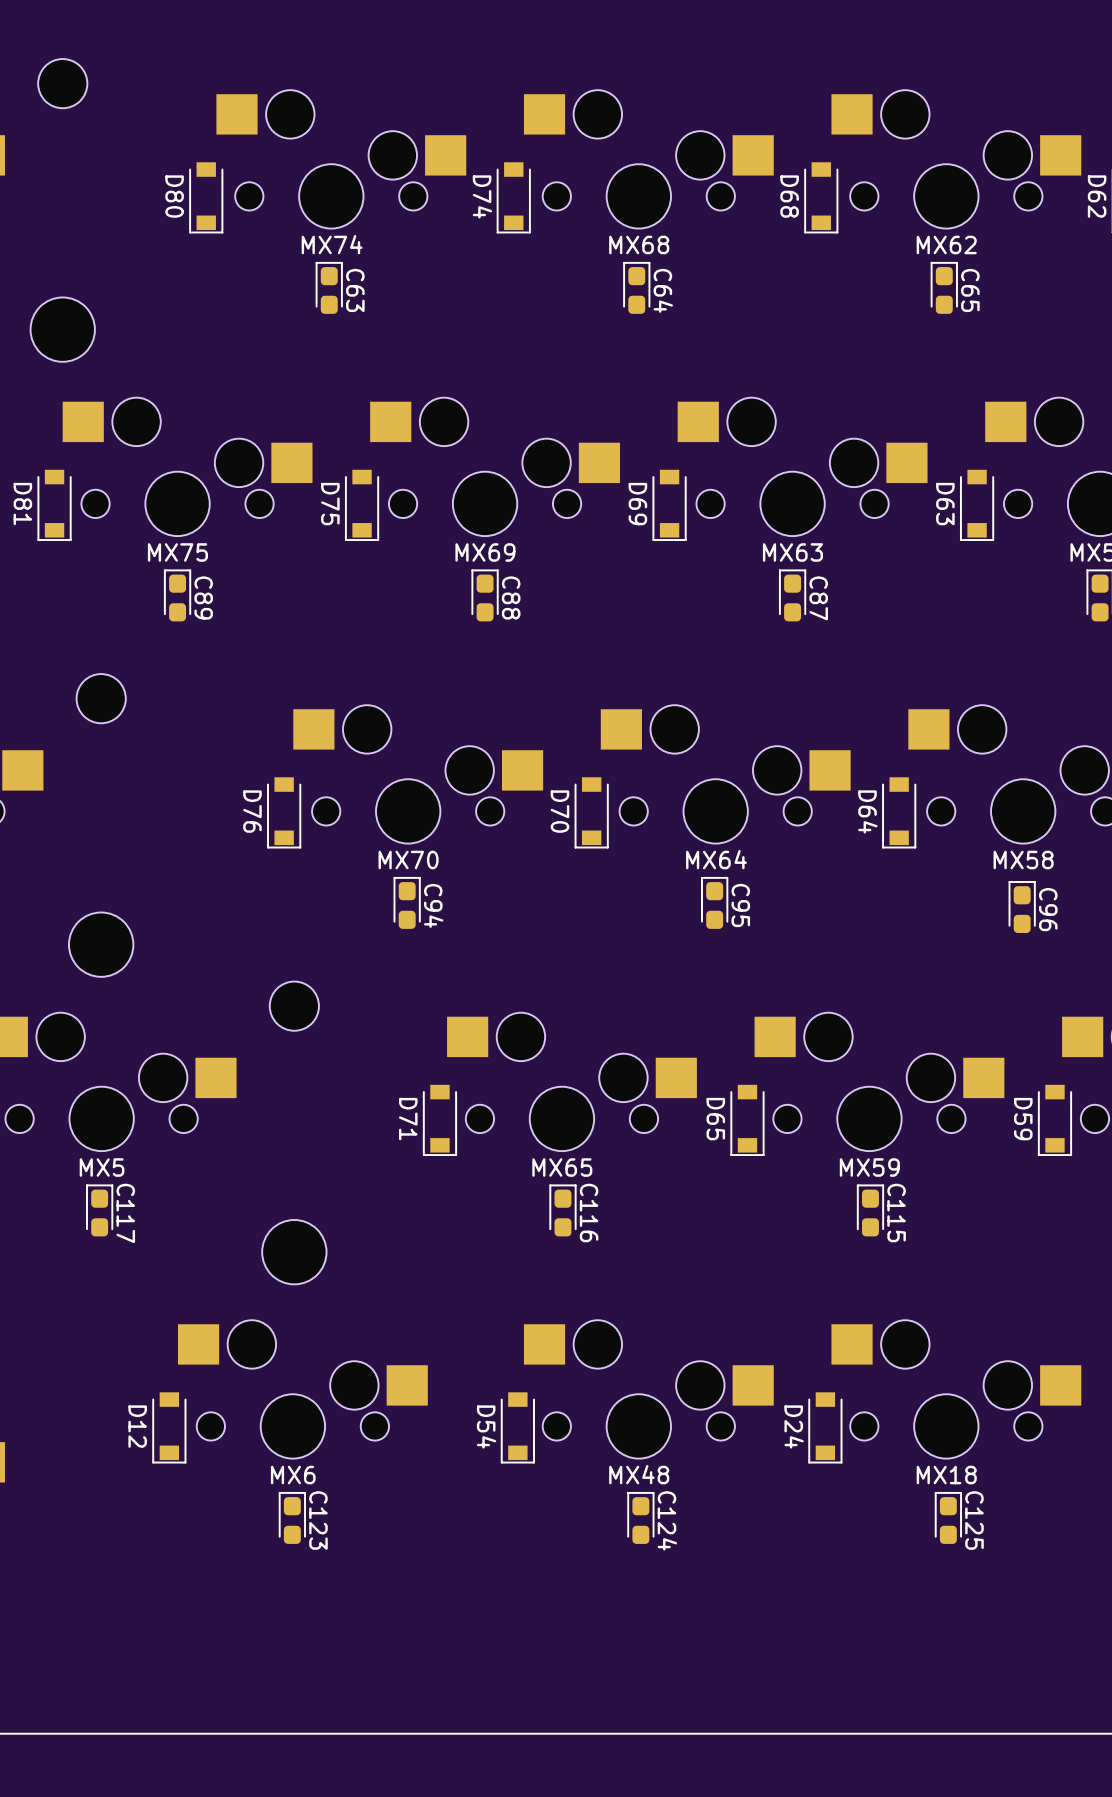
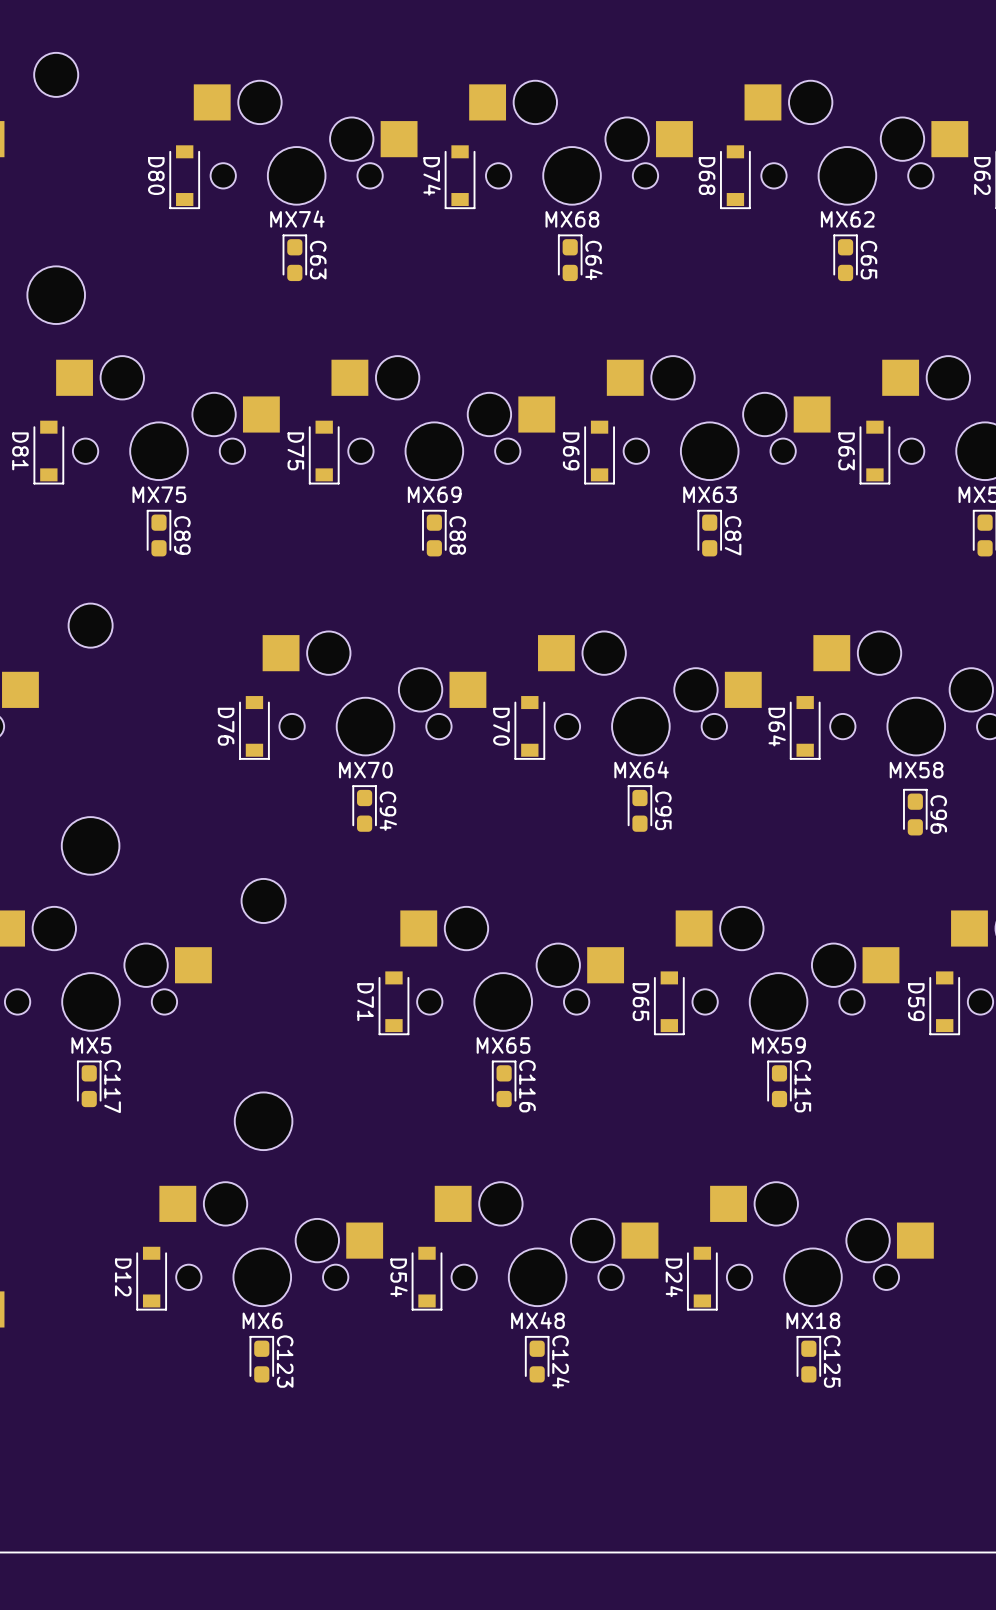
MX48 position: (648, 1389) -> (546, 1244)
MX18 position: (956, 1389) -> (821, 1244)
D54 position: (517, 1427) -> (427, 1278)
D24 position: (825, 1427) -> (702, 1278)
C124 position: (640, 1517) -> (537, 1359)
C125 position: (948, 1517) -> (808, 1359)

